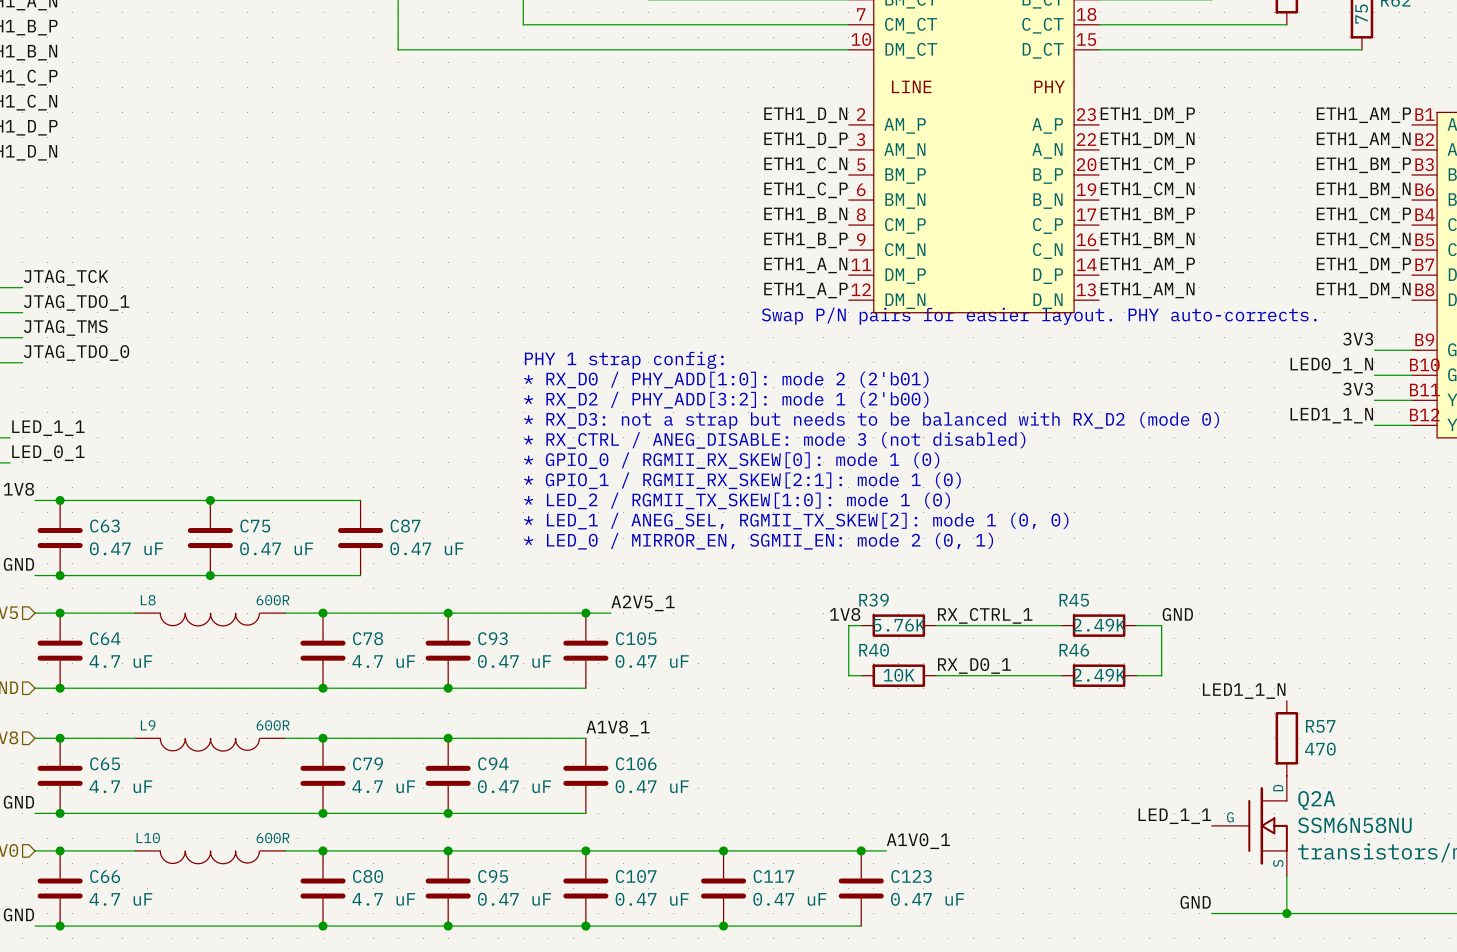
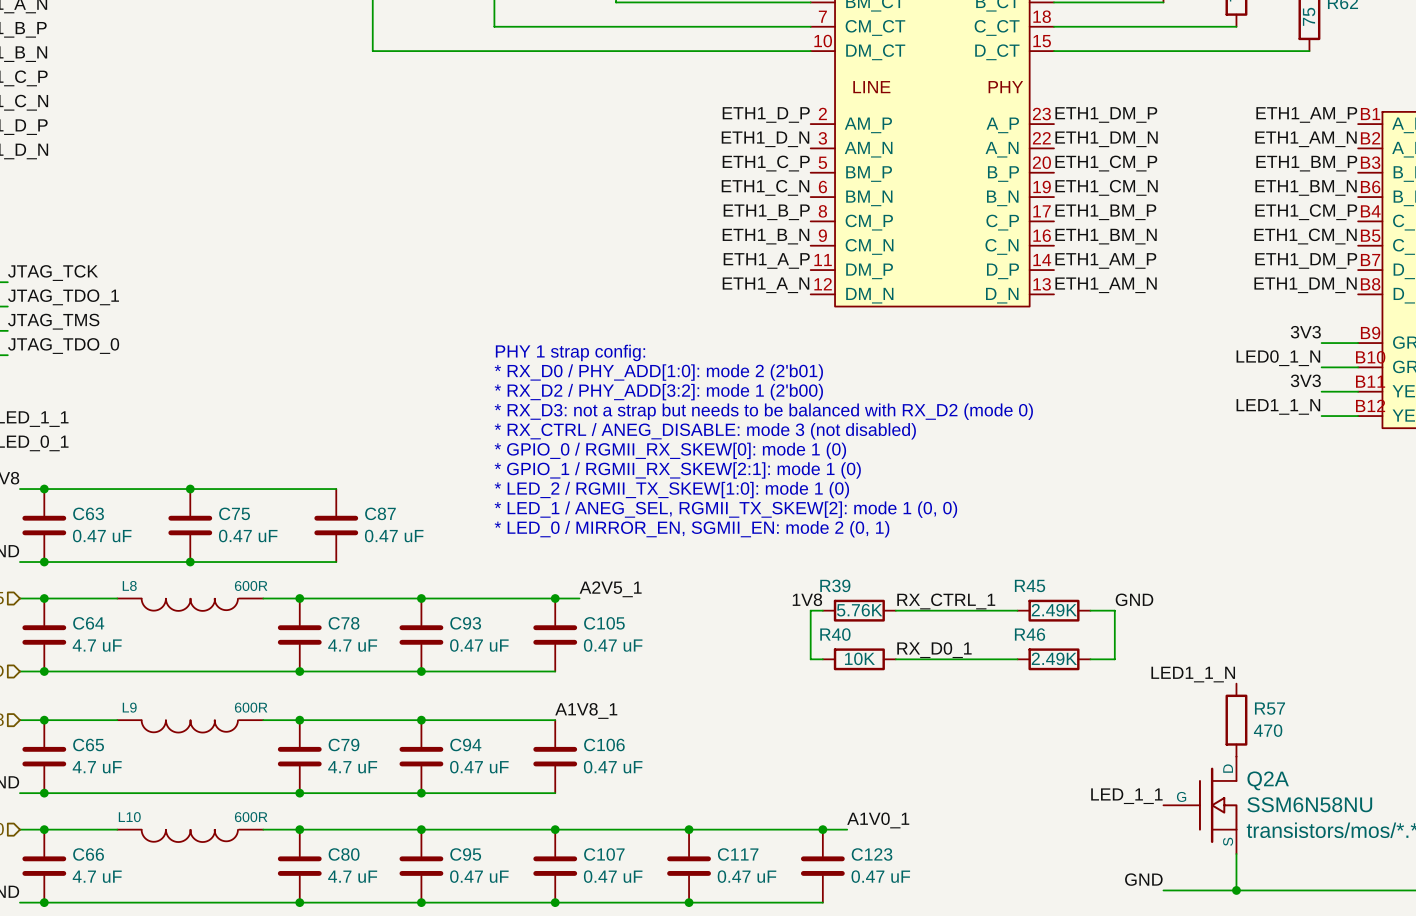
label: ETH1_D_N (805, 115) -> ETH1_D_P (766, 114)
label: ETH1_D_P (805, 140) -> ETH1_D_N (765, 139)
label: ETH1_C_N (805, 165) -> ETH1_C_P (766, 163)
label: ETH1_C_P (805, 190) -> ETH1_C_N (765, 187)
label: ETH1_B_N (805, 215) -> ETH1_B_P (766, 212)
label: ETH1_B_P (805, 240) -> ETH1_B_N (765, 236)
label: ETH1_A_N (805, 265) -> ETH1_A_P (766, 260)
label: ETH1_A_P (805, 290) -> ETH1_A_N (765, 285)
text: Swap P/N pairs for easier layout. PHY auto-corrects. (1039, 316) -> none

